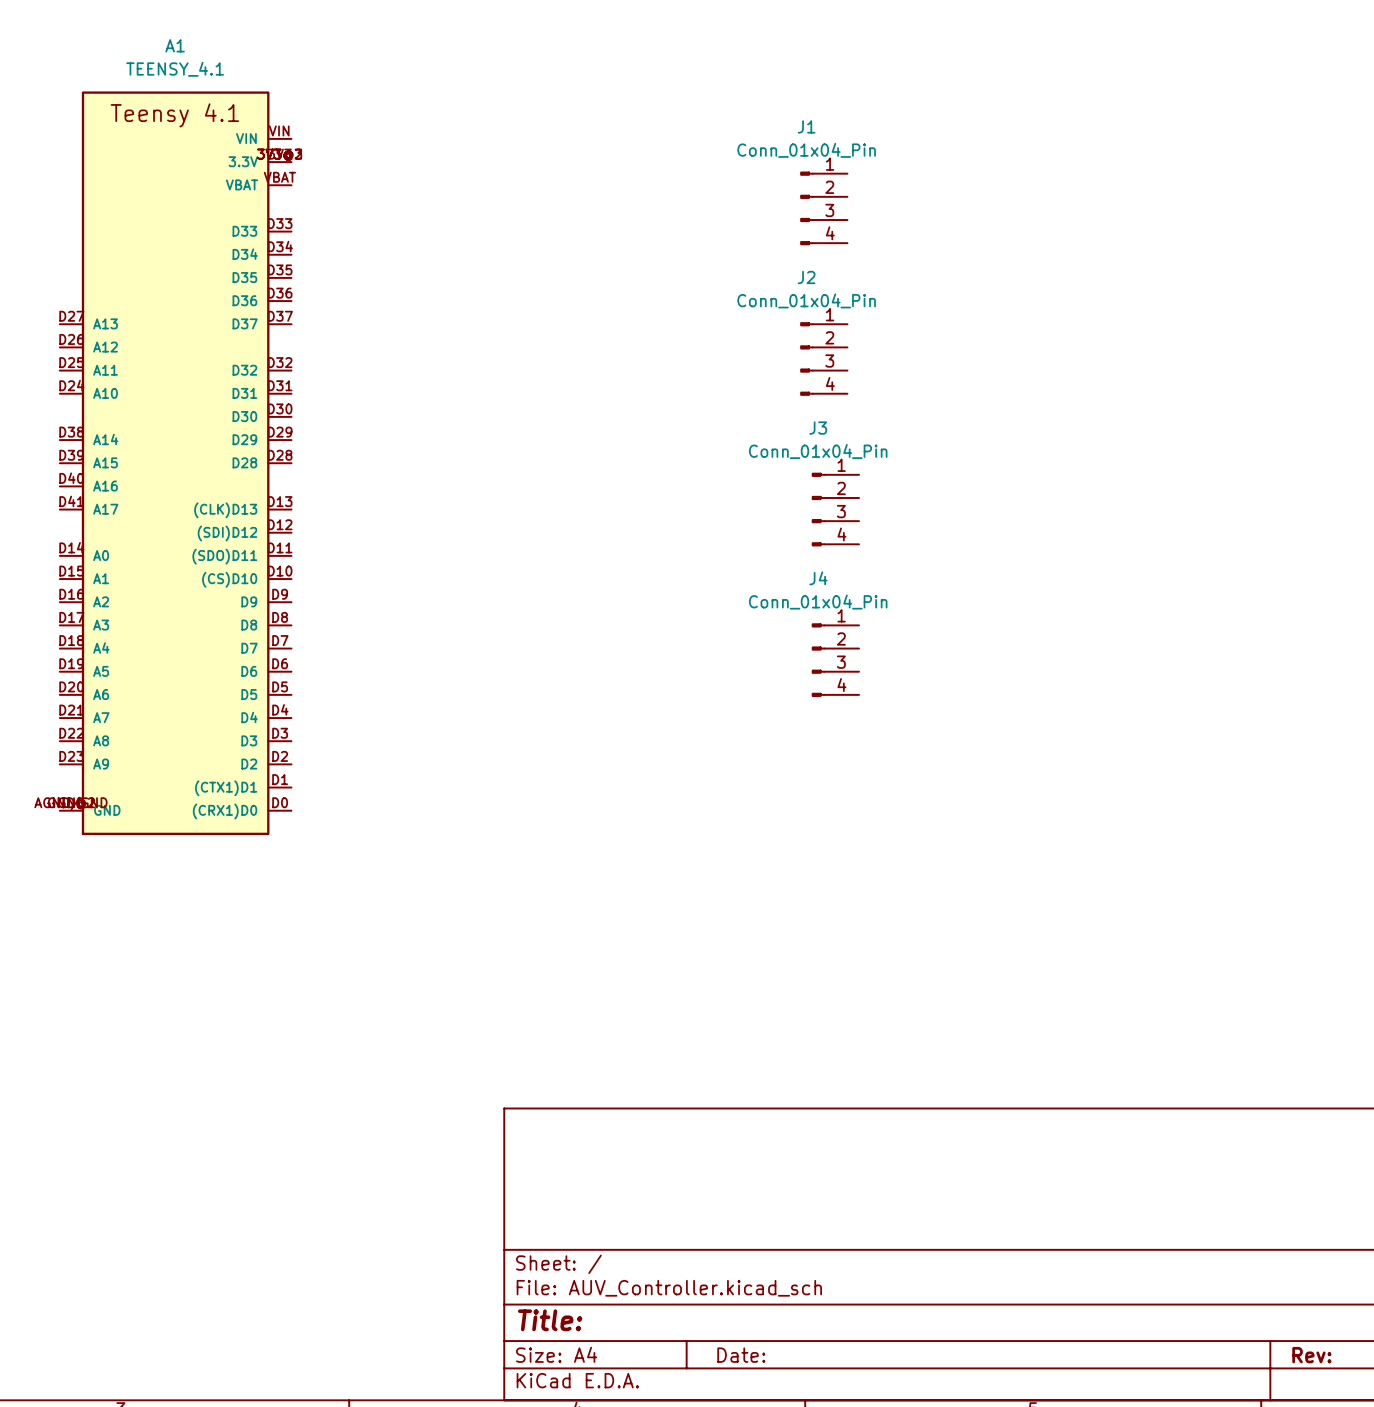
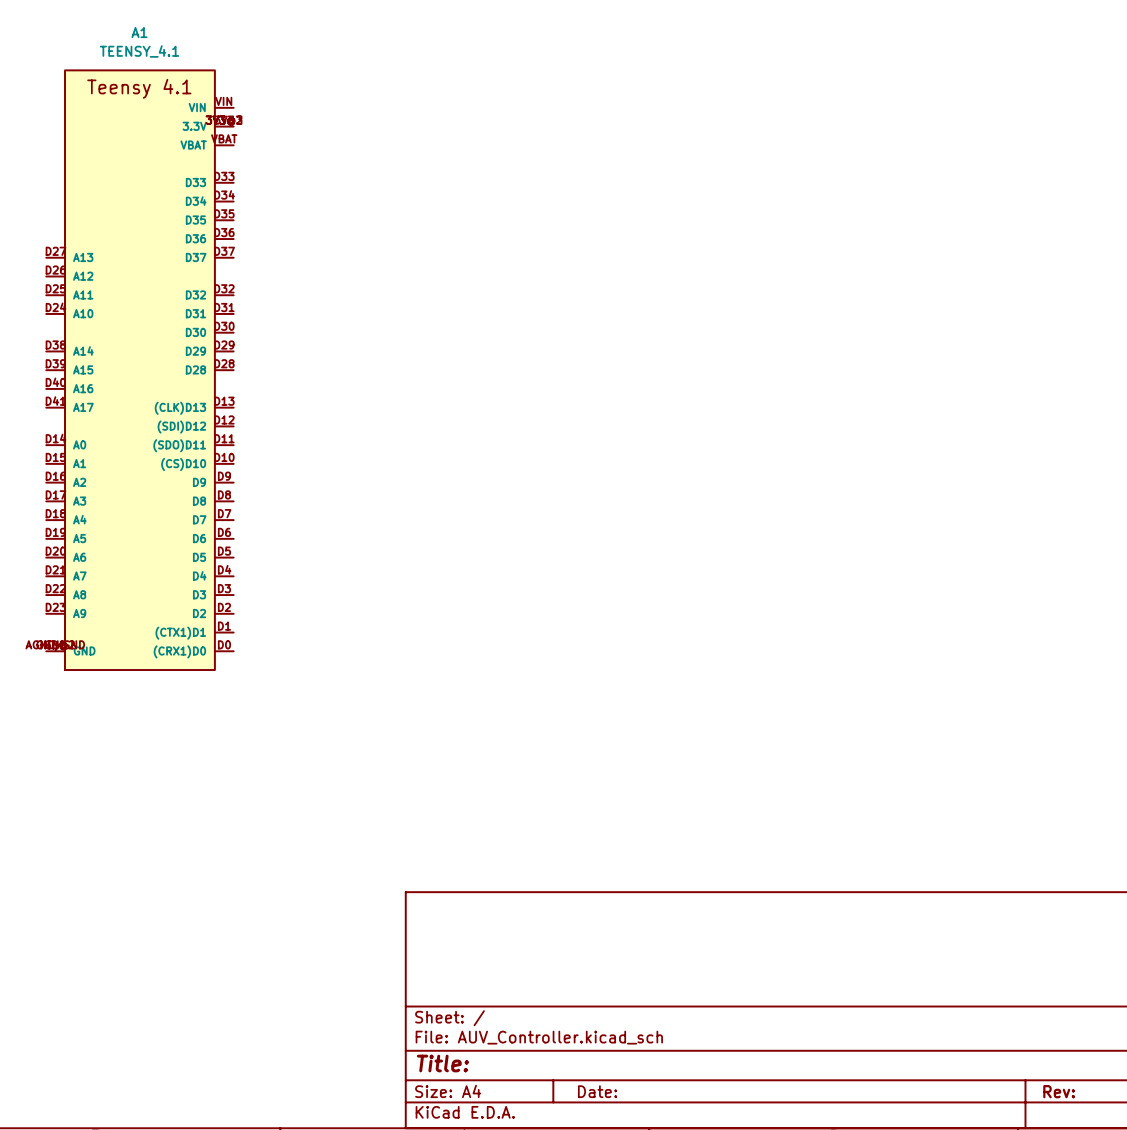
J1: Conn_01x04_Pin (823, 208) -> none
J2: Conn_01x04_Pin (823, 358) -> none
J3: Conn_01x04_Pin (835, 509) -> none
J4: Conn_01x04_Pin (835, 660) -> none

